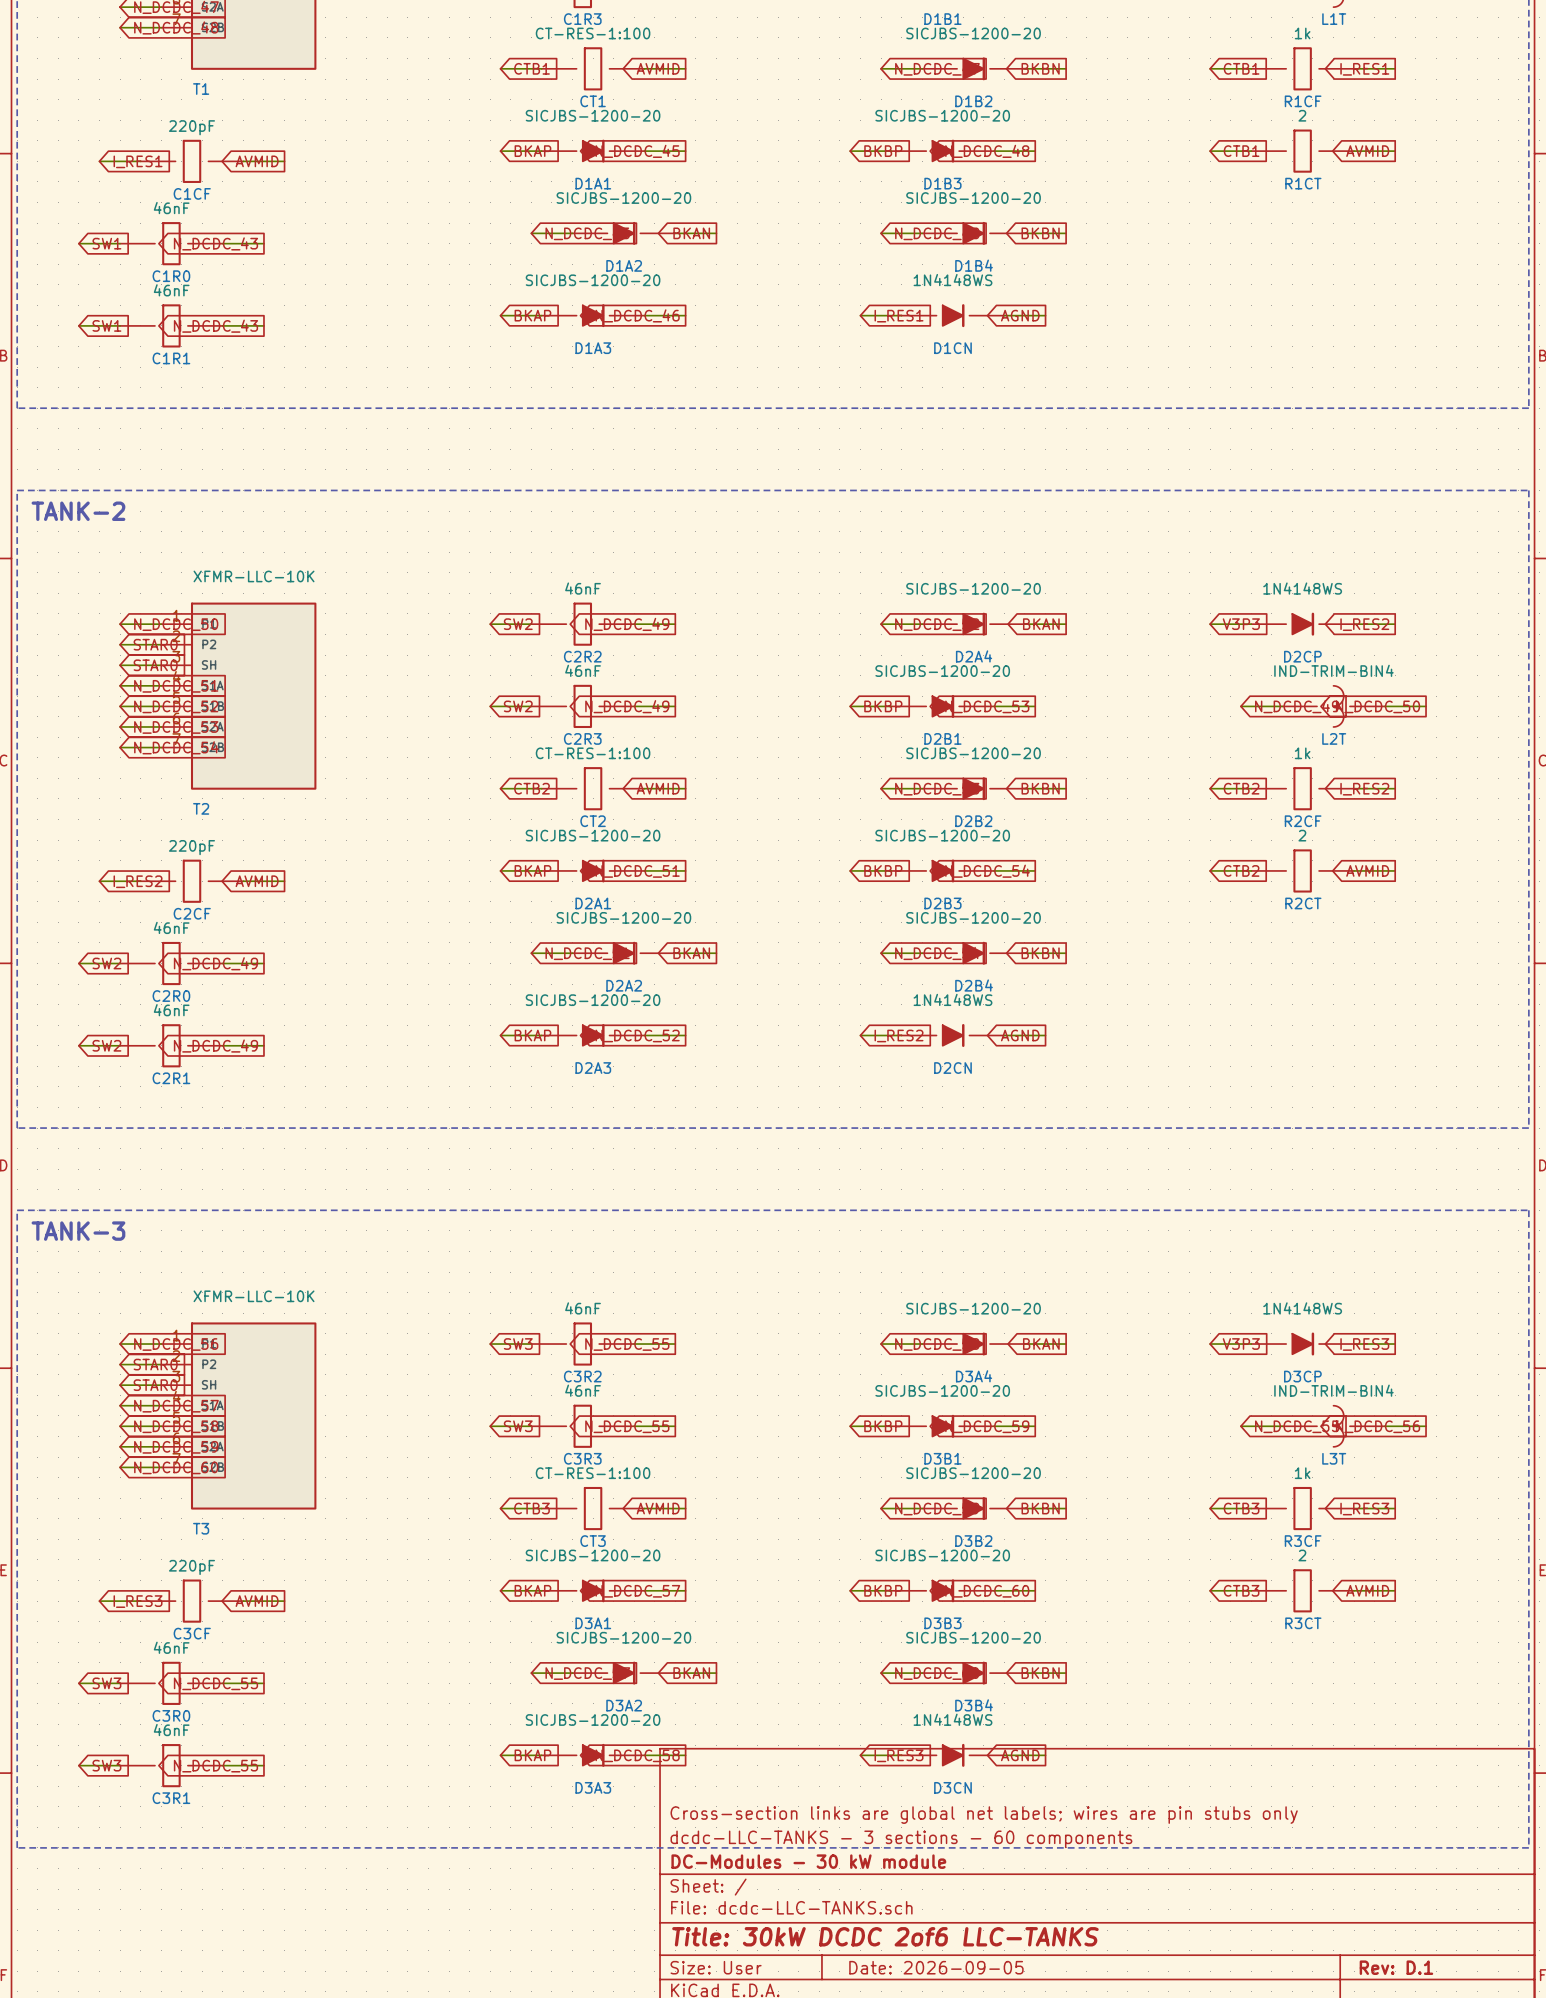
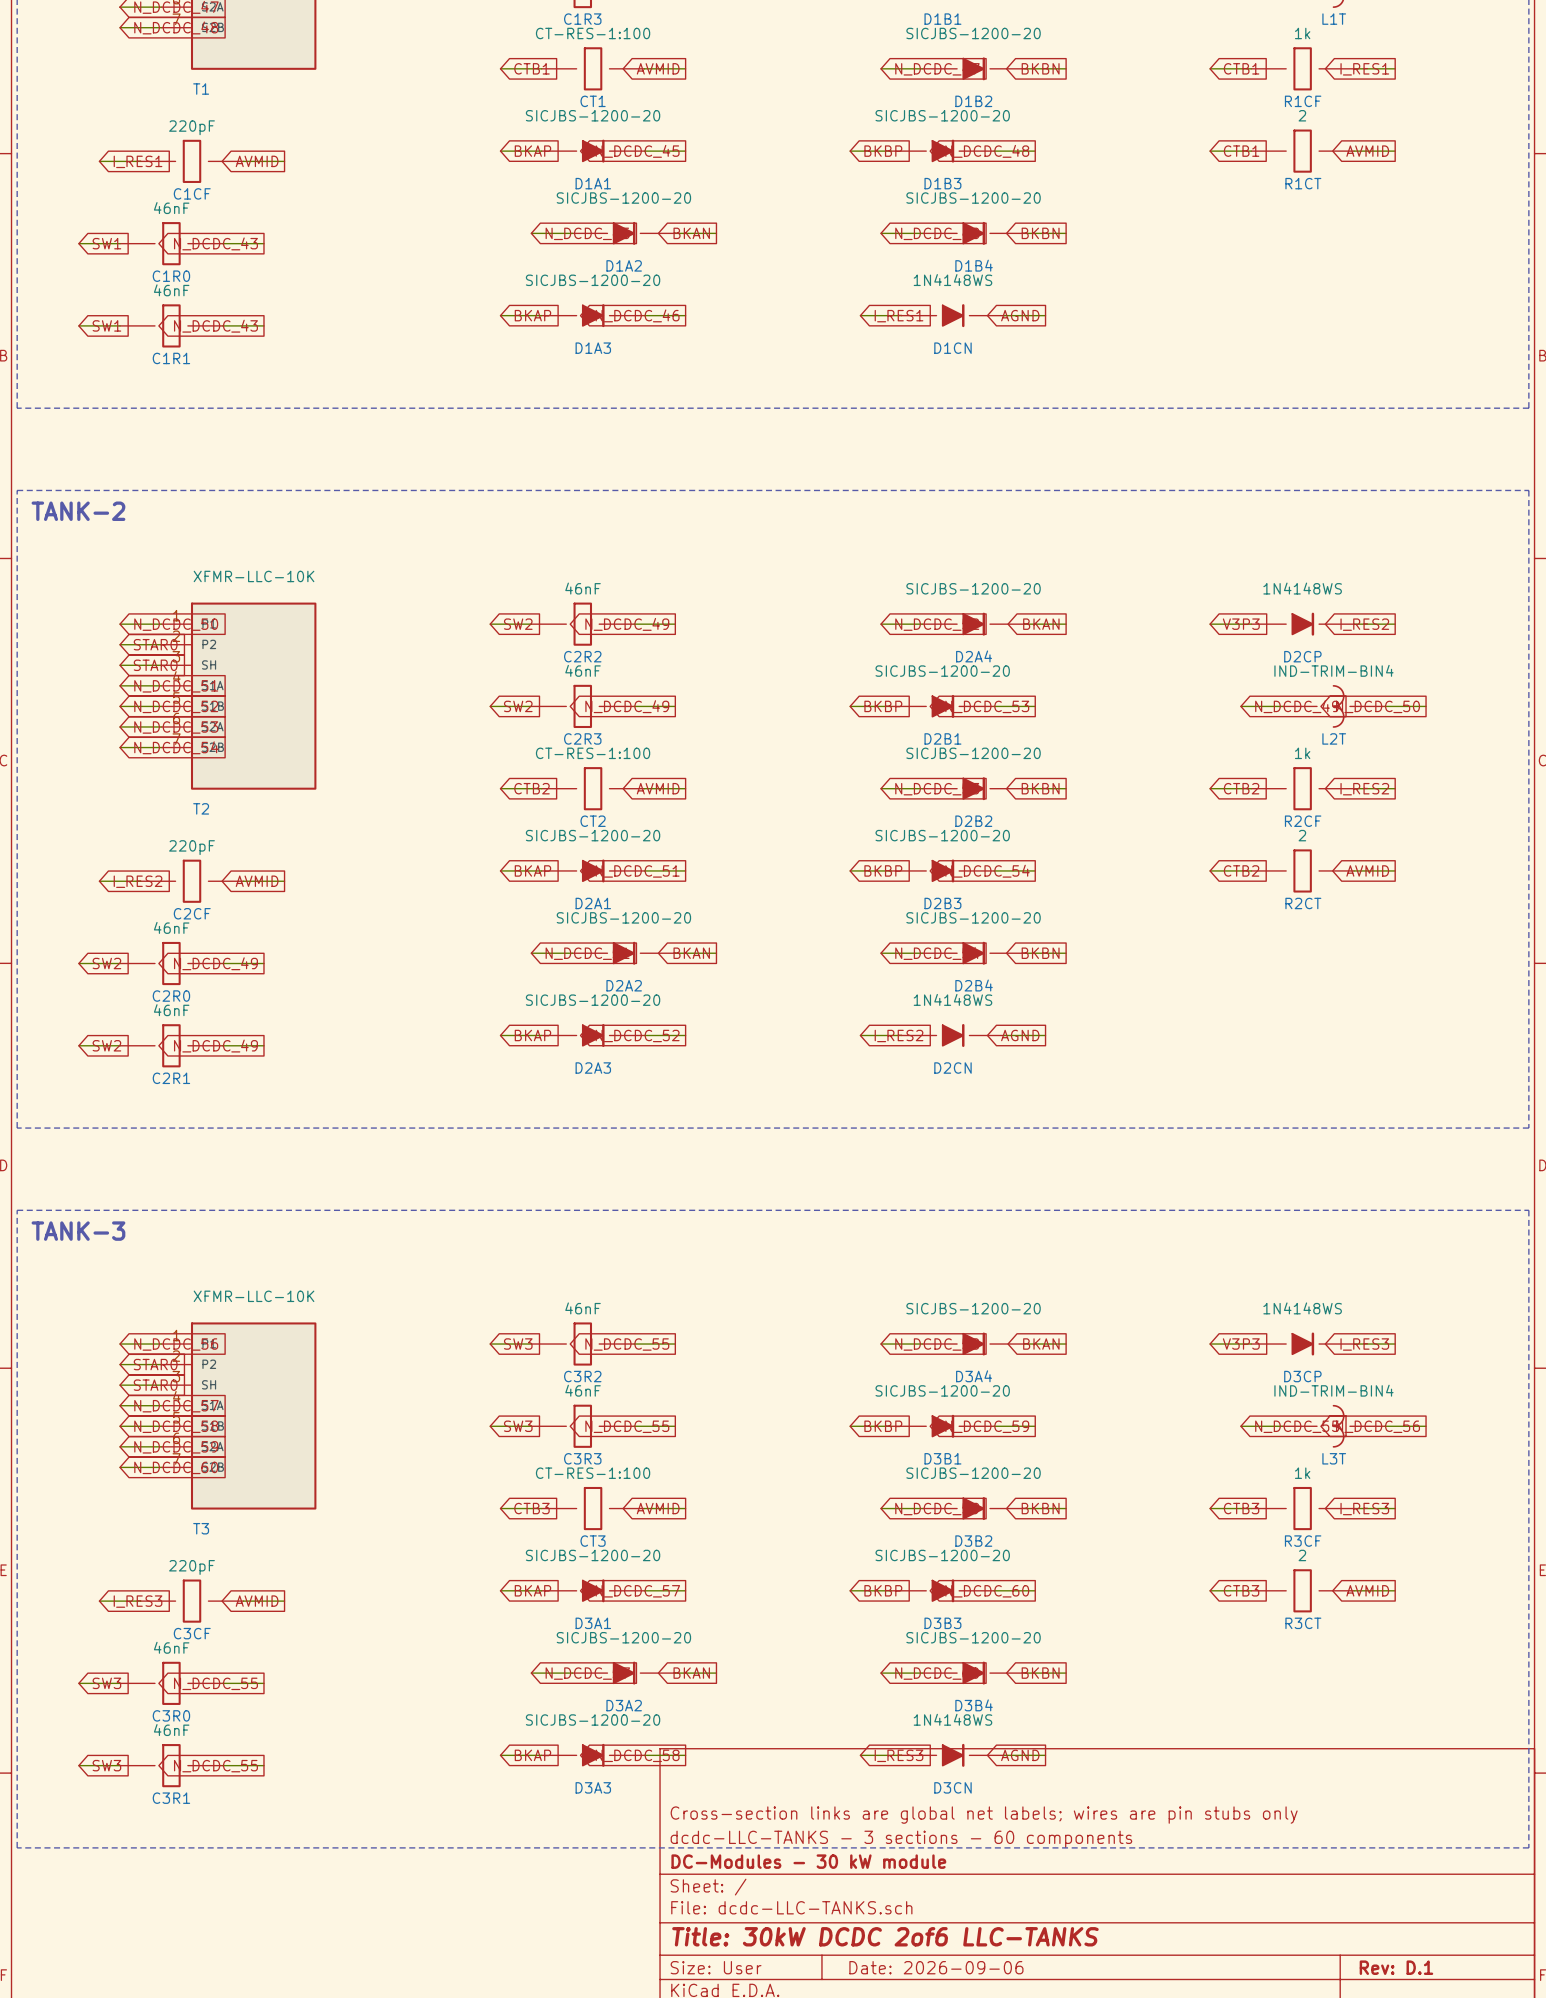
title block: Date: 2026-09-05 (936, 1967) -> Date: 2026-09-06 (936, 1967)

